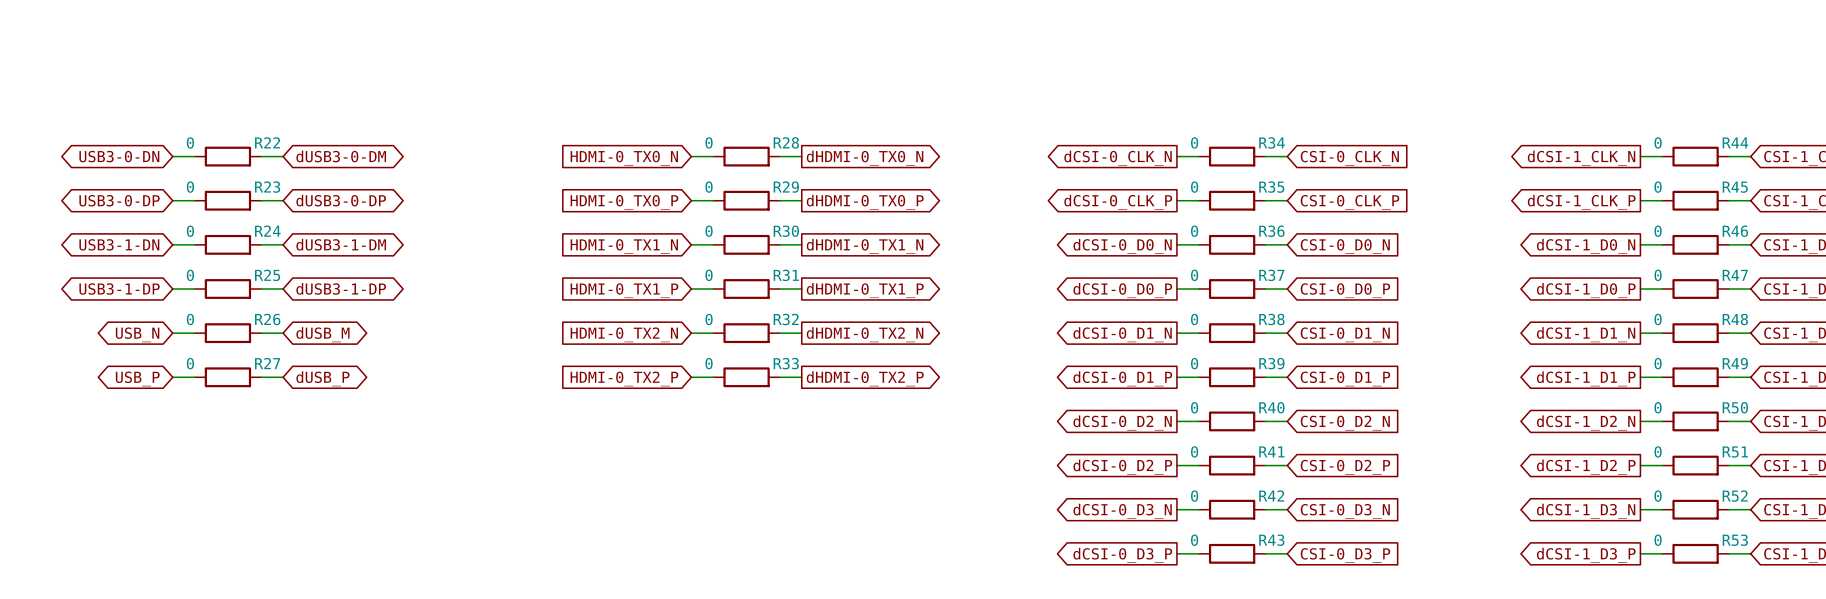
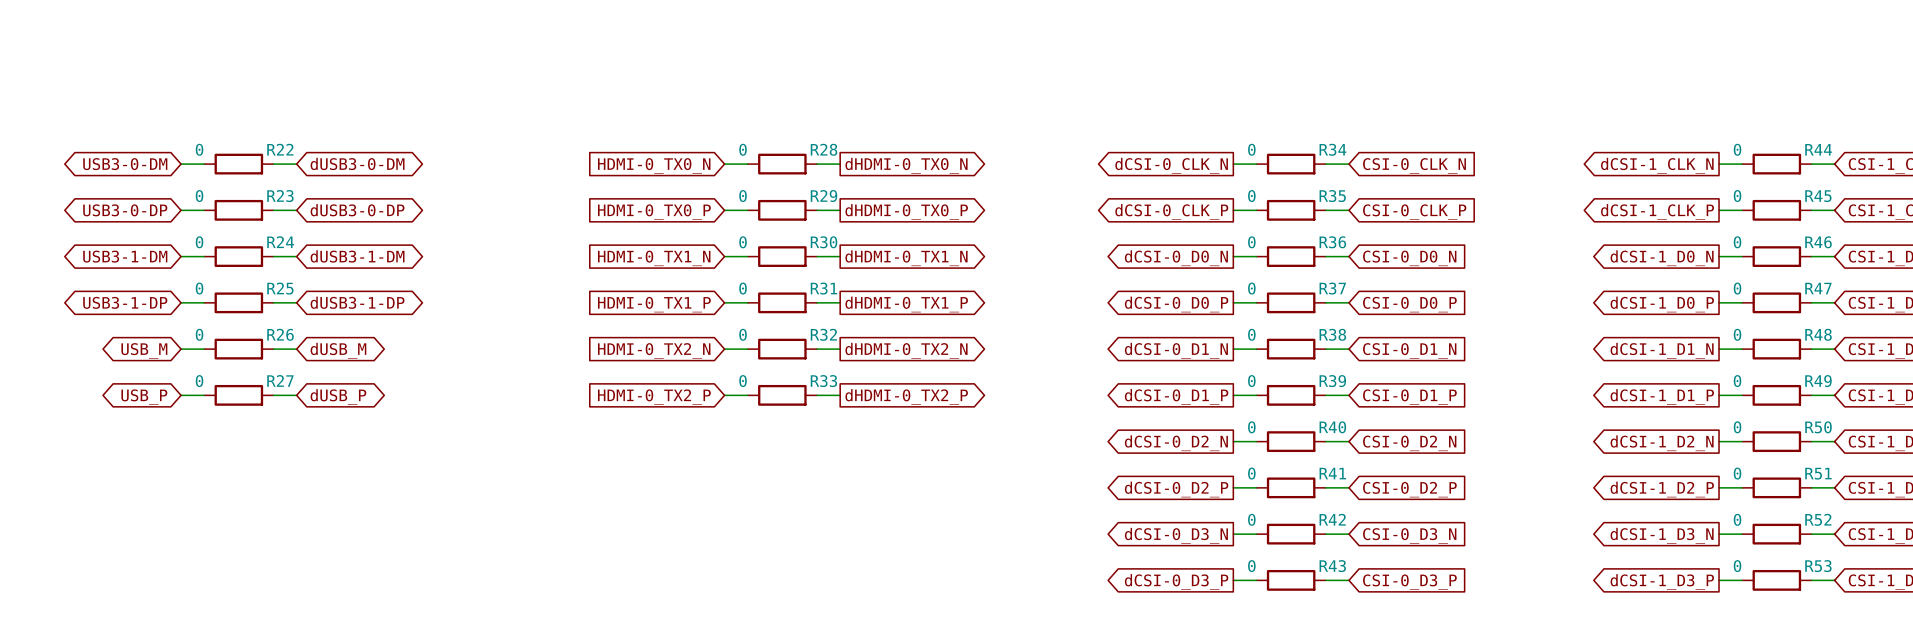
global label: USB3-0-DN (119, 156) -> USB3-0-DM (125, 164)
global label: USB3-1-DN (119, 244) -> USB3-1-DM (125, 256)
global label: USB_N (137, 334) -> USB_M (144, 350)

